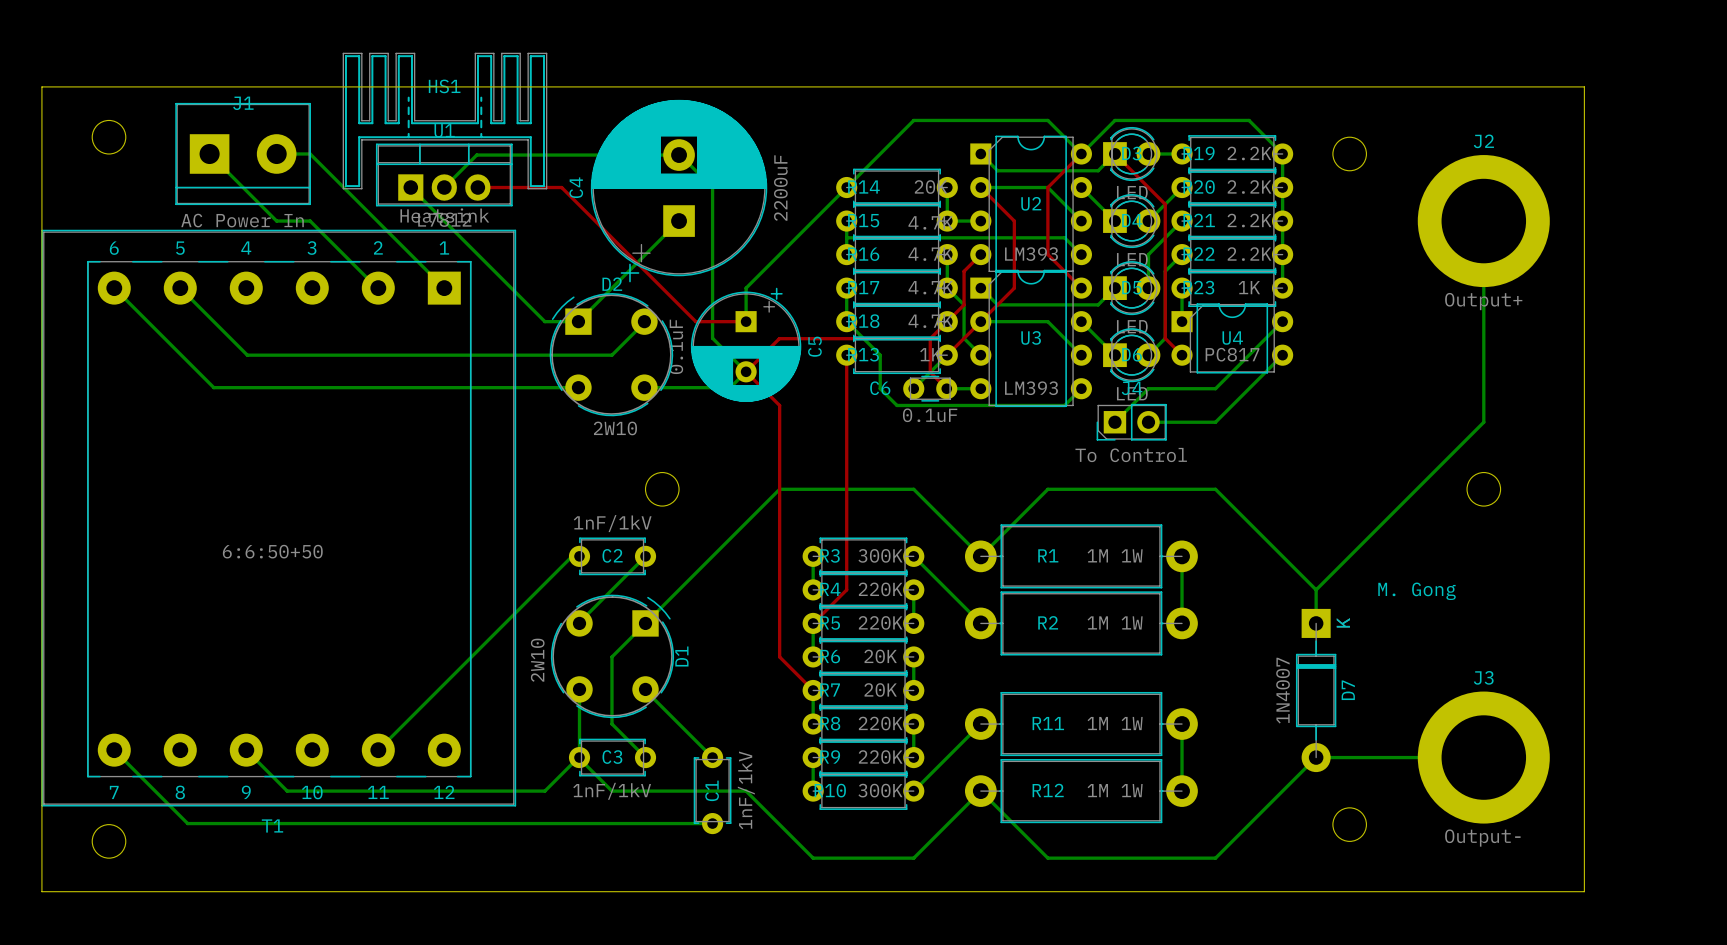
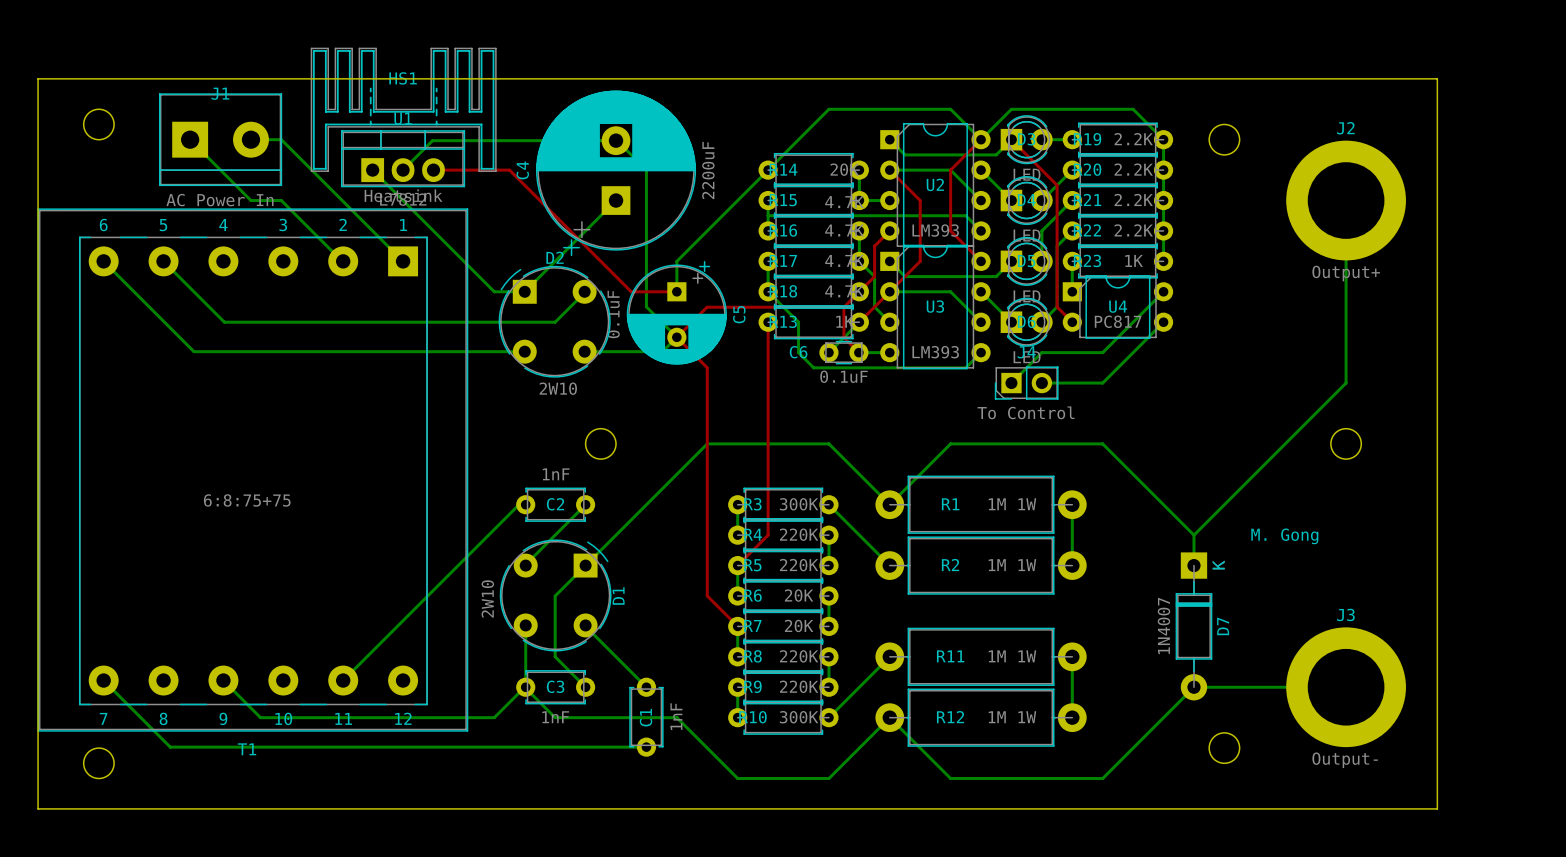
C2 value: 1nF/1kV (612, 523) -> 1nF (556, 474)
T1 value: 6:6:50+50 (272, 551) -> 6:8:75+75 (247, 500)
C1 value: 1nF/1kV (746, 790) -> 1nF (676, 716)
C3 value: 1nF/1kV (612, 791) -> 1nF (555, 717)

